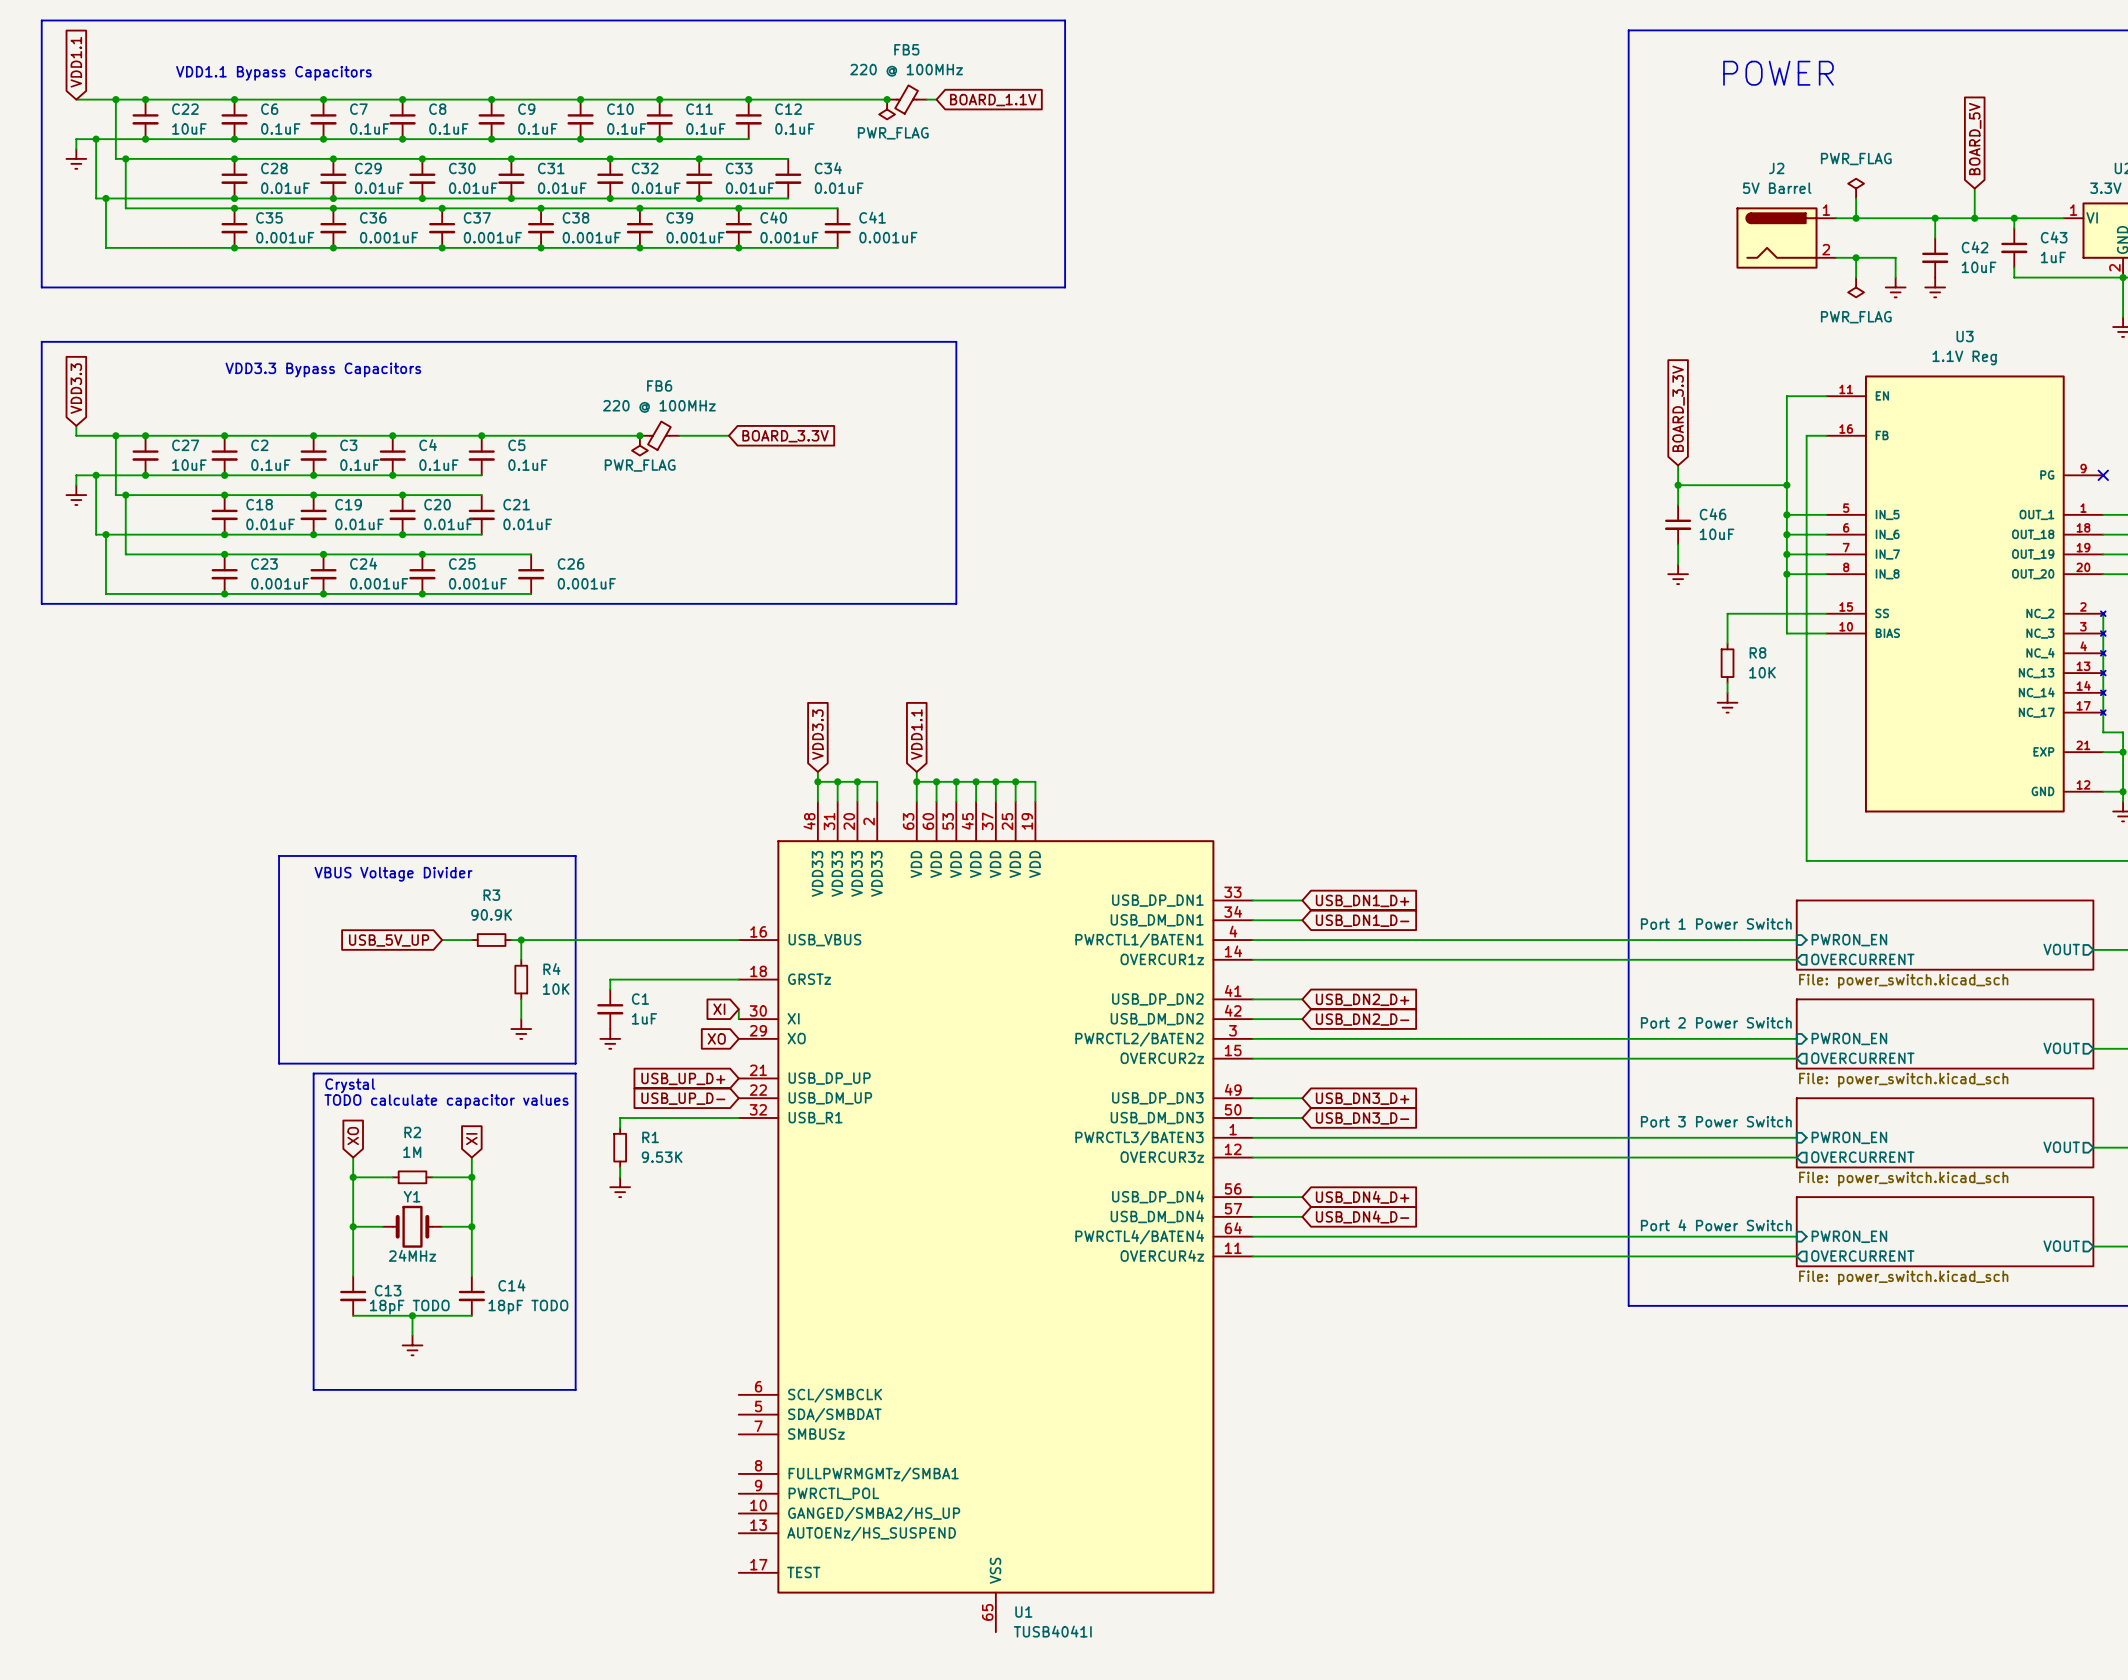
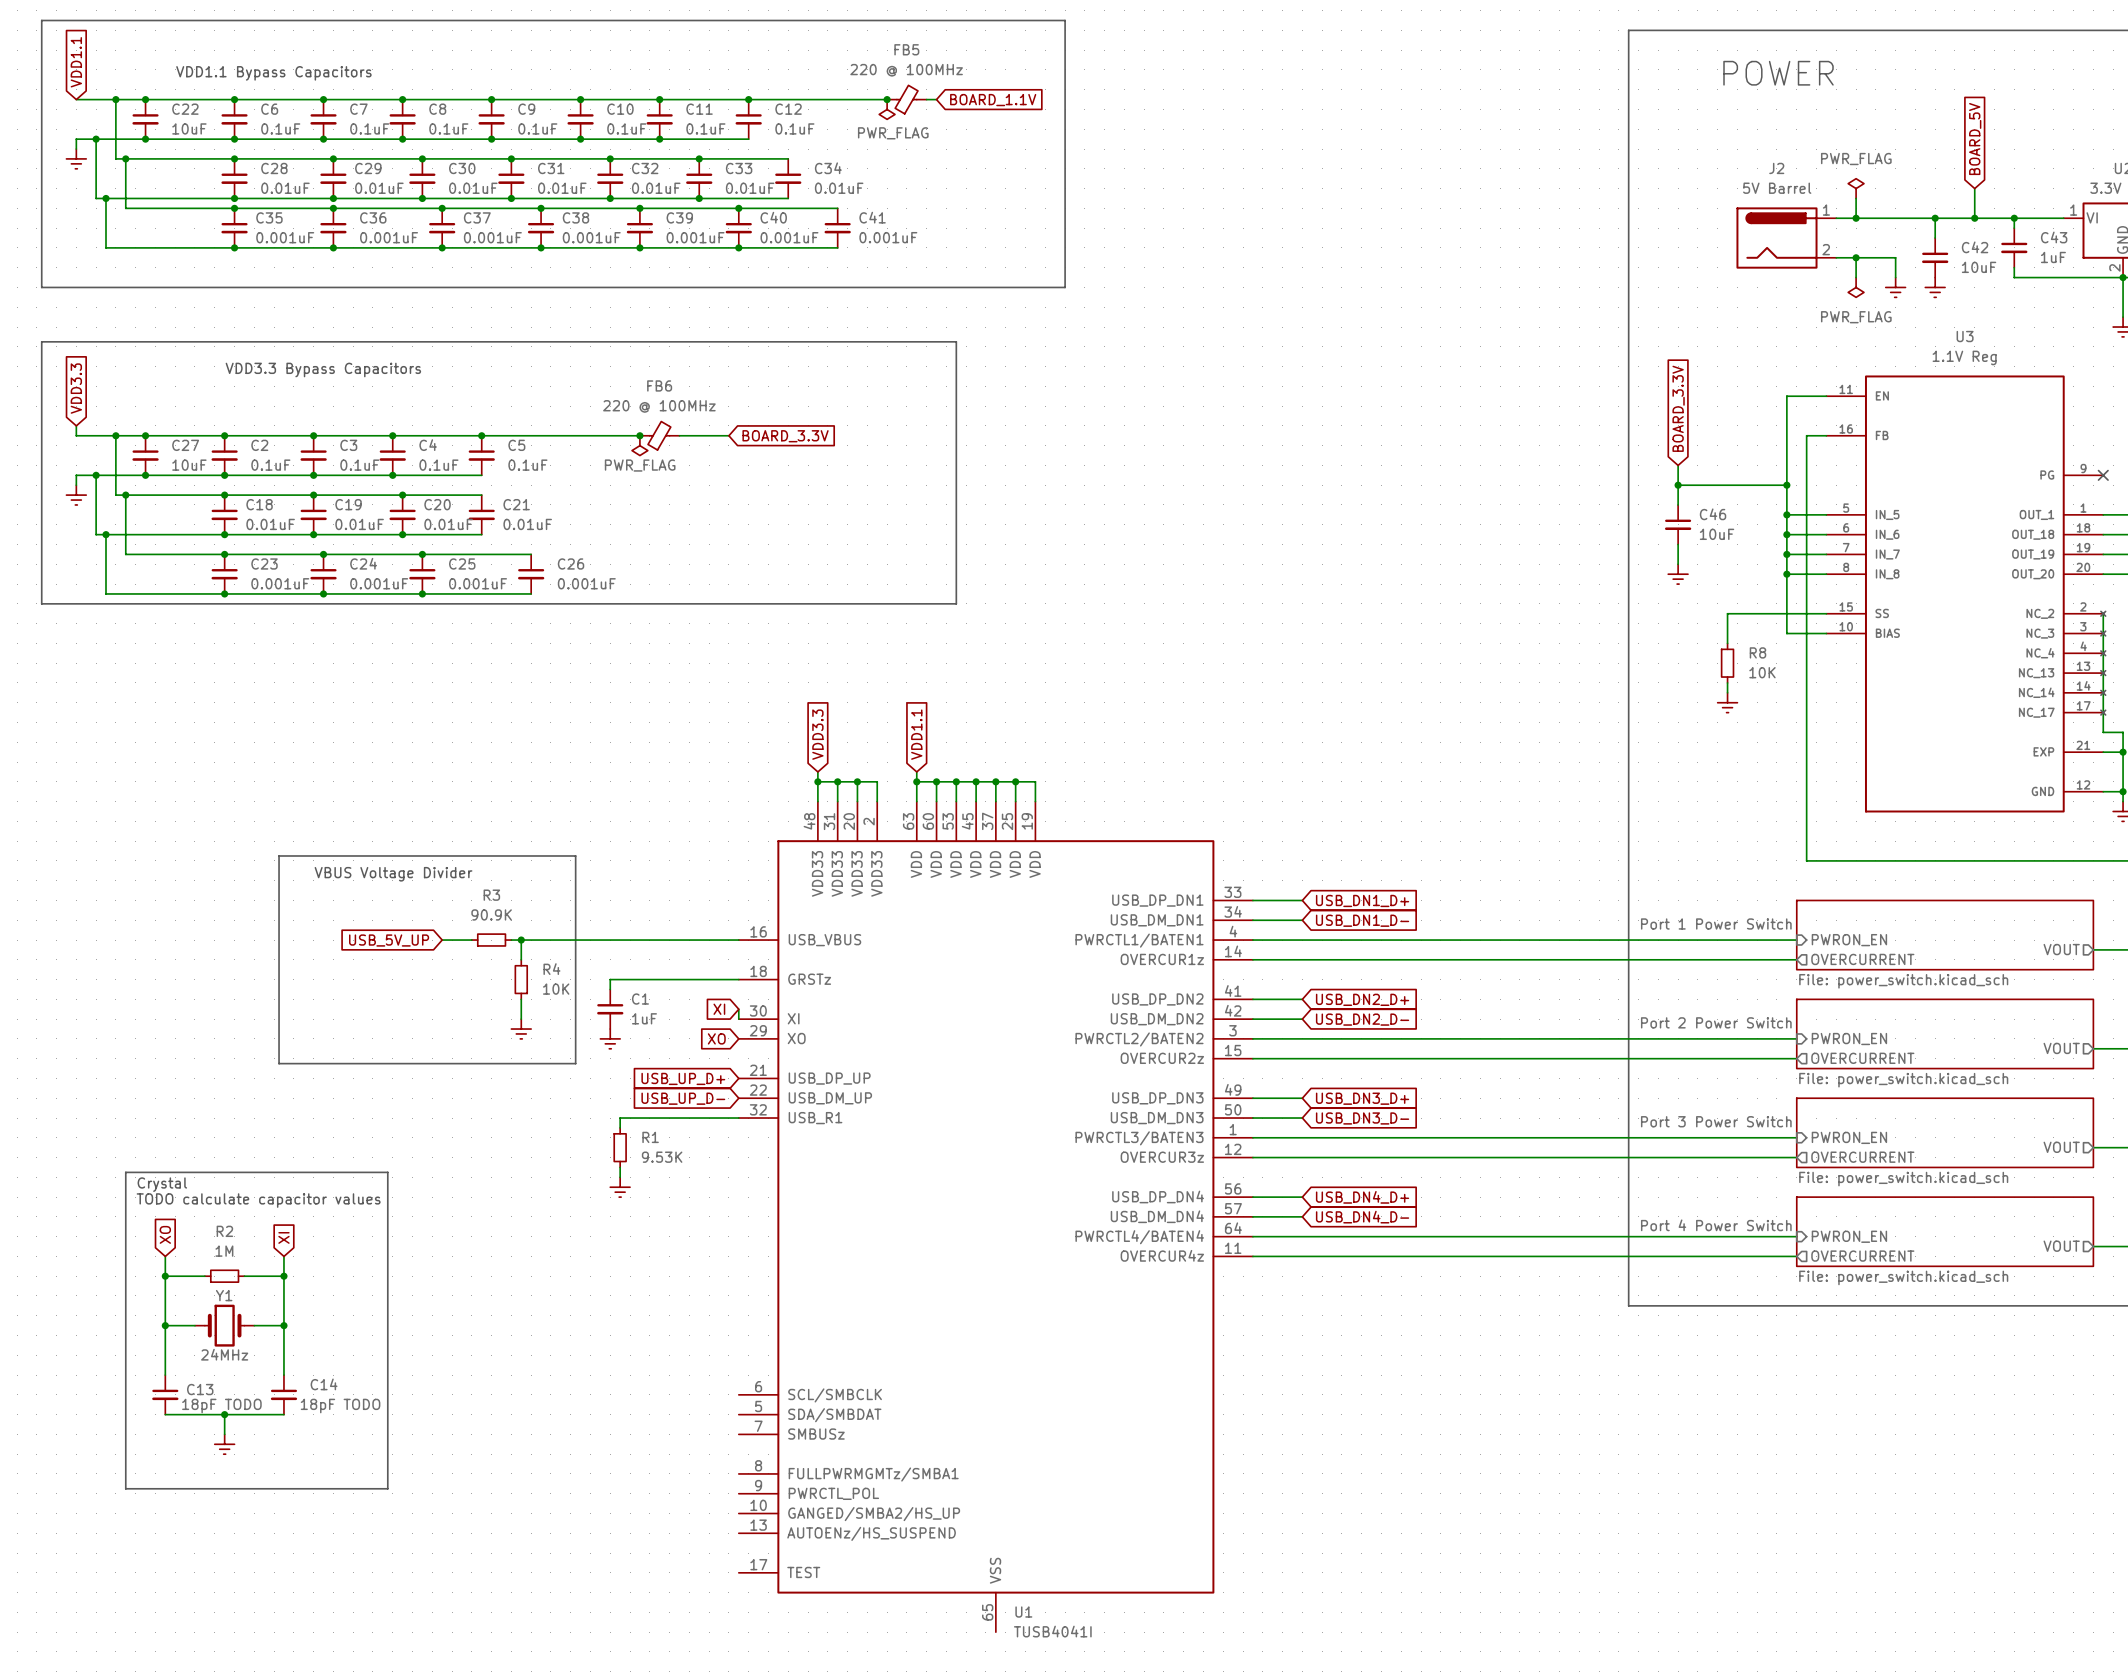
line: (313, 1073) (575, 1073) (575, 1389) (313, 1389) (313, 1073) -> none
text: Crystal (350, 1085) -> none
text: TODO calculate capacitor values (446, 1101) -> none
global label: XO (353, 1136) -> none
global label: XI (471, 1139) -> none
wire: (353, 1157) (353, 1276) -> (283, 1256) (283, 1375)
wire: (471, 1157) (471, 1276) -> none
line: none -> (125, 1172) (387, 1172) (387, 1488) (125, 1488) (125, 1172)
wire: (353, 1177) (392, 1177) -> (244, 1276) (283, 1276)
junction: (353, 1177) -> none
R2 position: (412, 1177) -> (224, 1276)
wire: (432, 1177) (471, 1177) -> none
junction: (471, 1177) -> none
text: none -> Crystal (162, 1184)
text: none -> TODO calculate capacitor values (258, 1200)
wire: (353, 1226) (382, 1226) -> (254, 1325) (283, 1325)
junction: (353, 1226) -> none
Y1 position: (412, 1226) -> (224, 1325)
wire: (442, 1226) (471, 1226) -> none
junction: (471, 1226) -> none
global label: none -> XO (165, 1234)
global label: none -> XI (283, 1237)
wire: none -> (165, 1256) (165, 1375)
wire: none -> (165, 1276) (204, 1276)
junction: none -> (165, 1276)
junction: none -> (283, 1276)
C13 position: (353, 1295) -> (165, 1394)
C14 position: (471, 1295) -> (283, 1394)
wire: (353, 1315) (471, 1315) -> none
wire: (412, 1315) (412, 1335) -> none
junction: (412, 1315) -> none
wire: none -> (165, 1325) (194, 1325)
junction: none -> (165, 1325)
junction: none -> (283, 1325)
power symbol: (412, 1345) -> none
wire: none -> (165, 1414) (283, 1414)
wire: none -> (224, 1414) (224, 1434)
junction: none -> (224, 1414)
power symbol: none -> (224, 1444)

